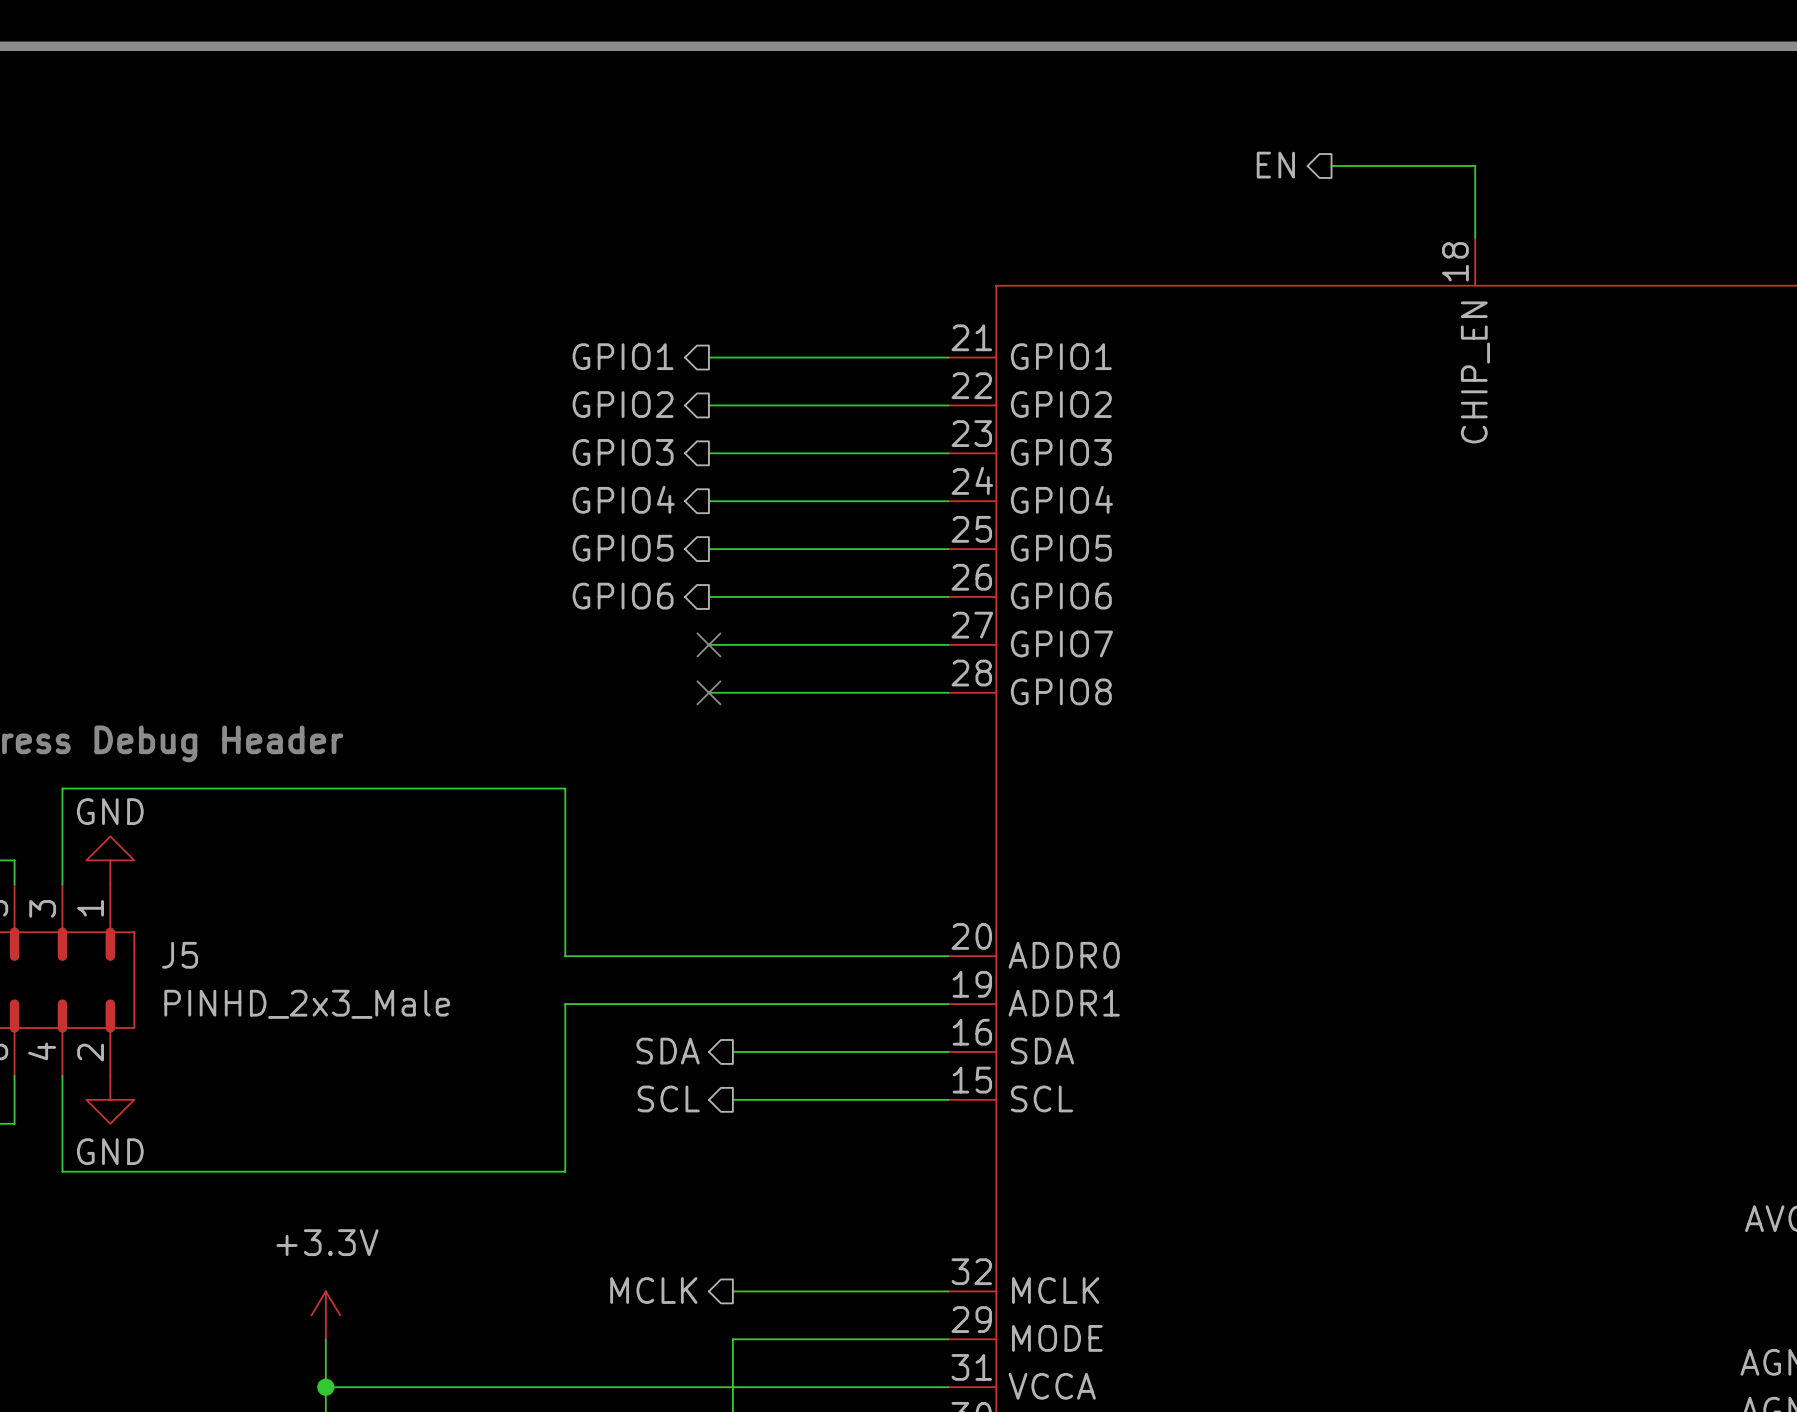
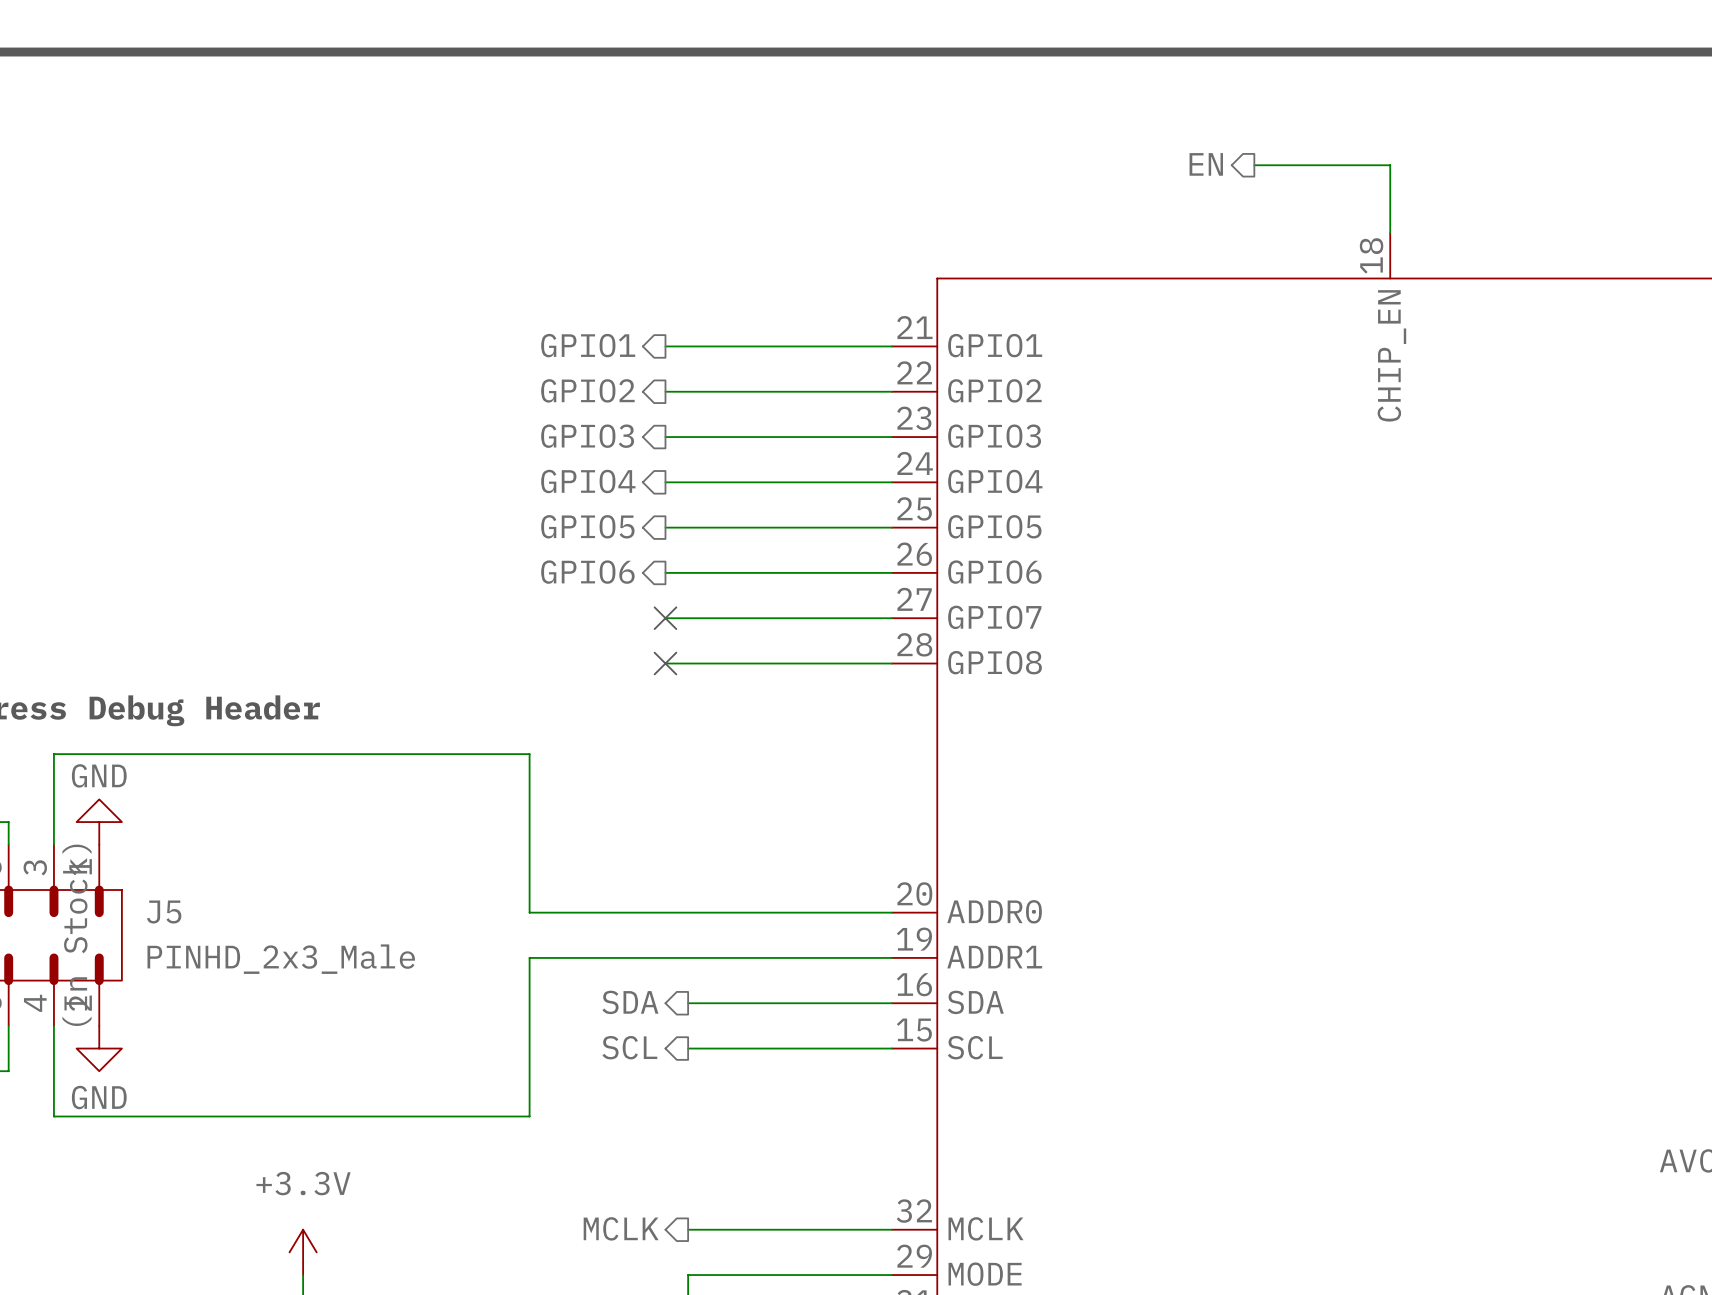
J5 text: none -> (In Stock) (77, 935)

